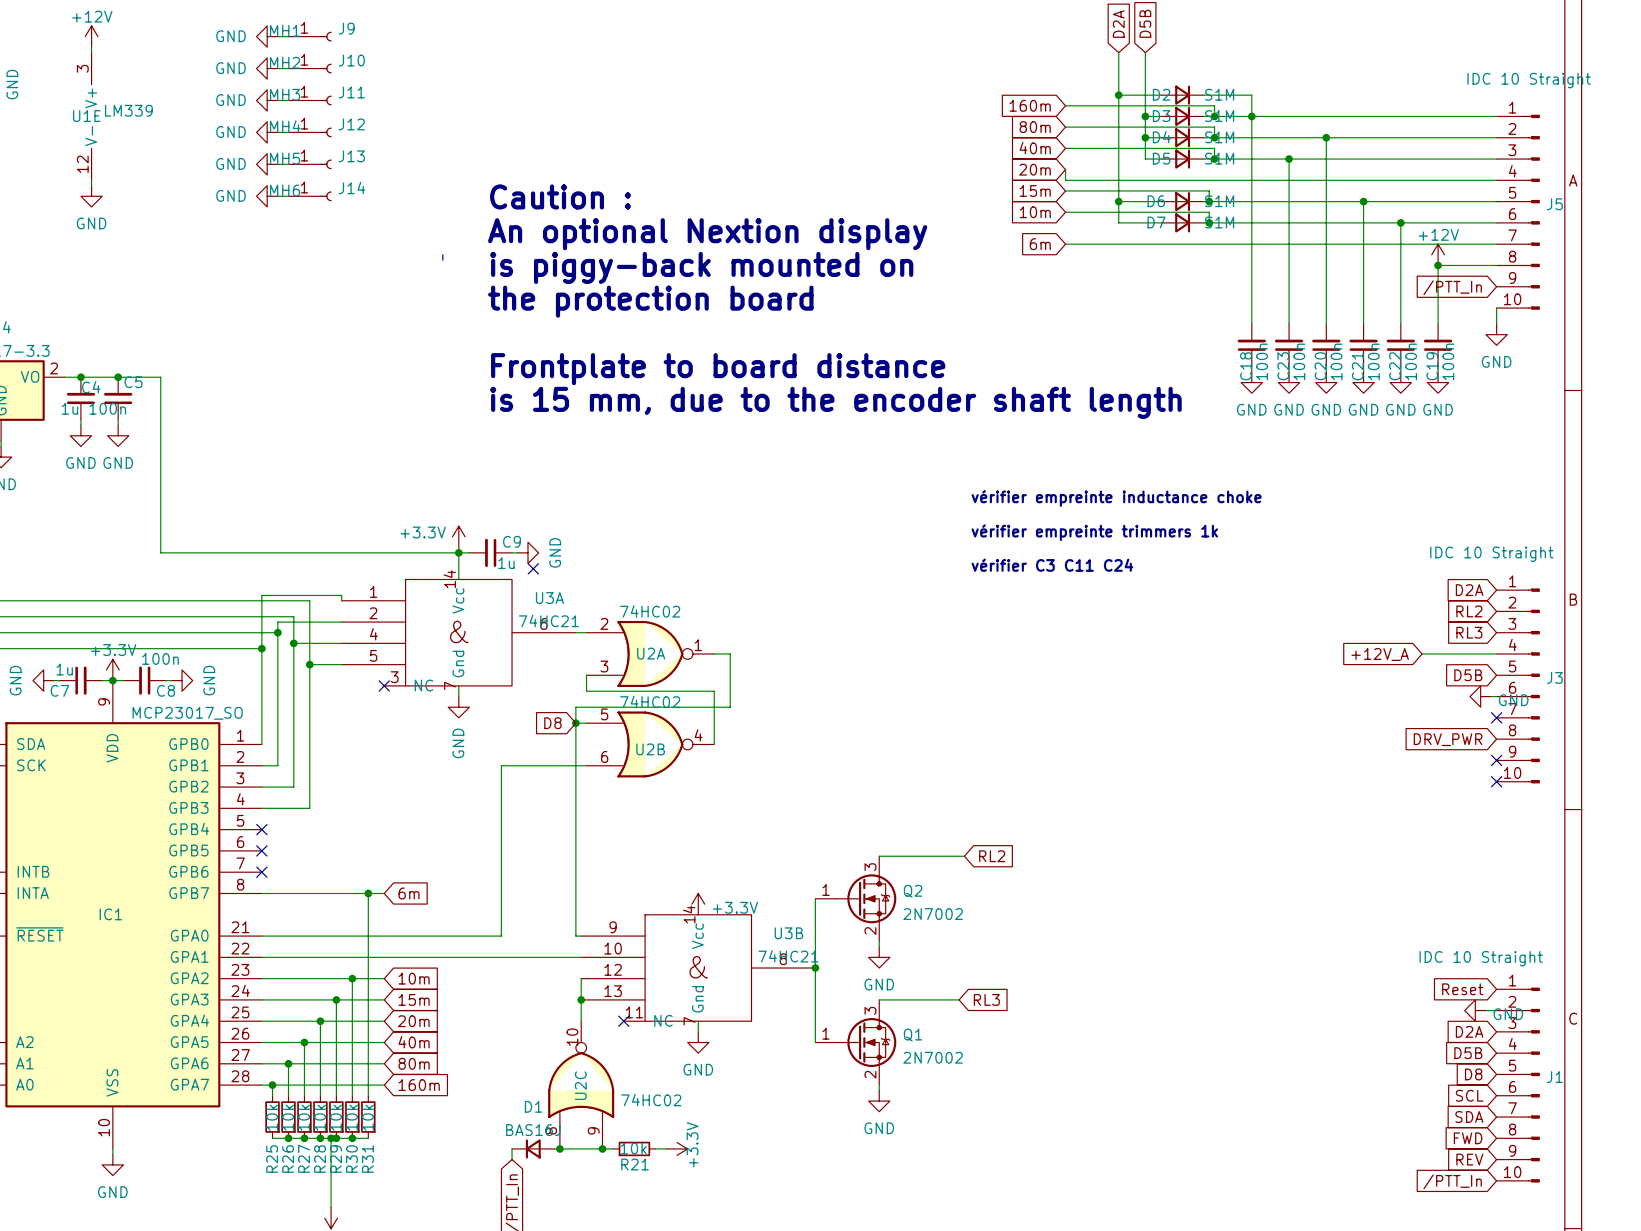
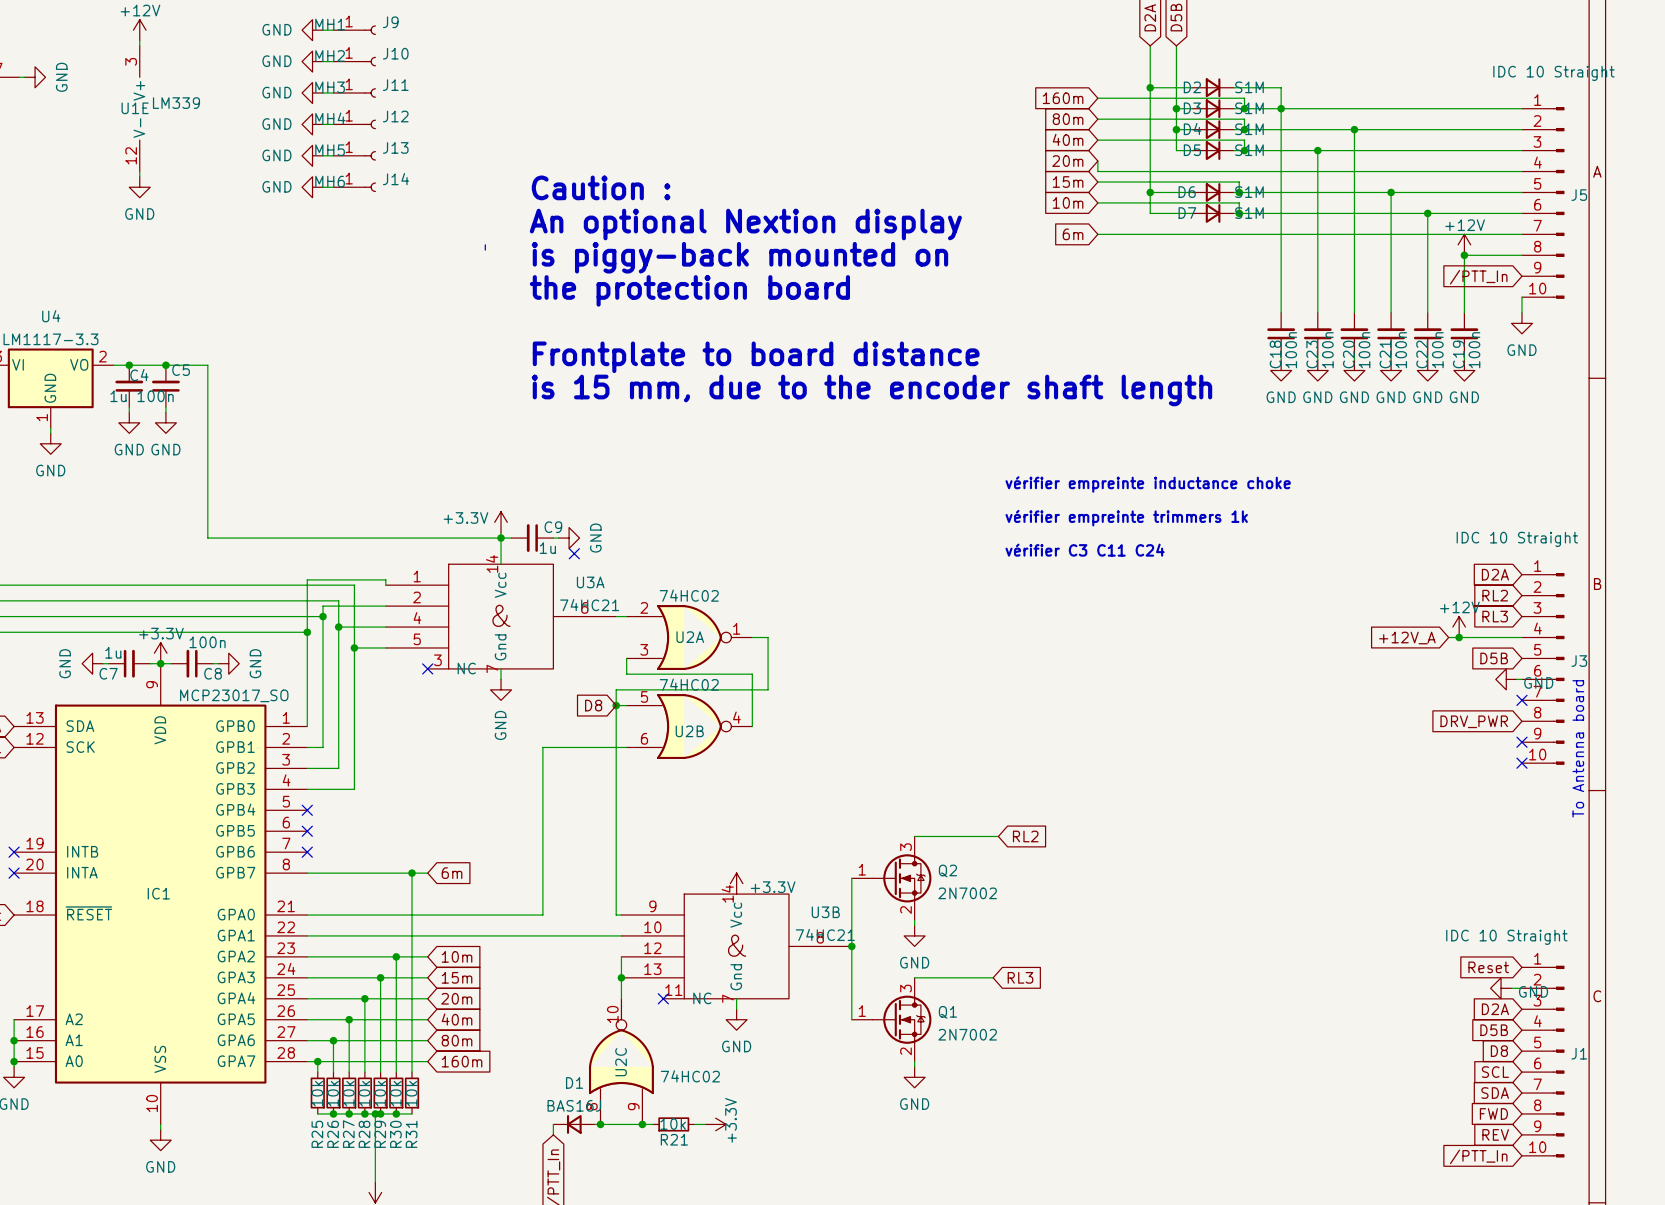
power symbol: none -> +12V (1459, 627)
junction: none -> (1459, 637)
text: none -> To Antenna board (1578, 748)

